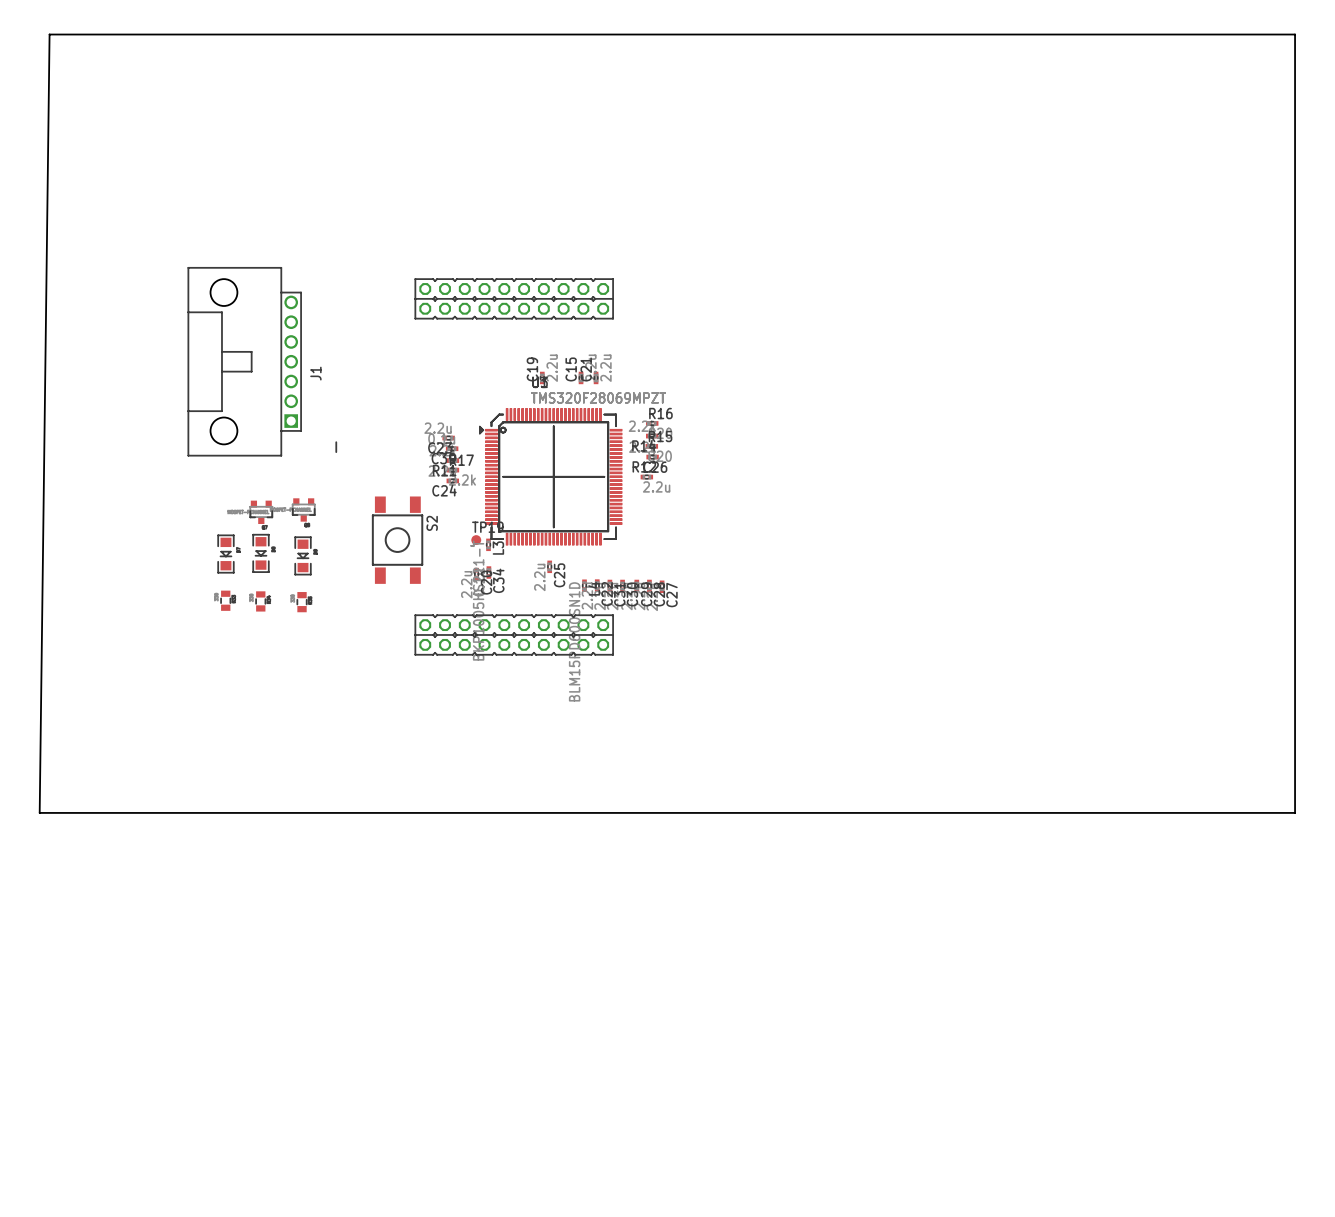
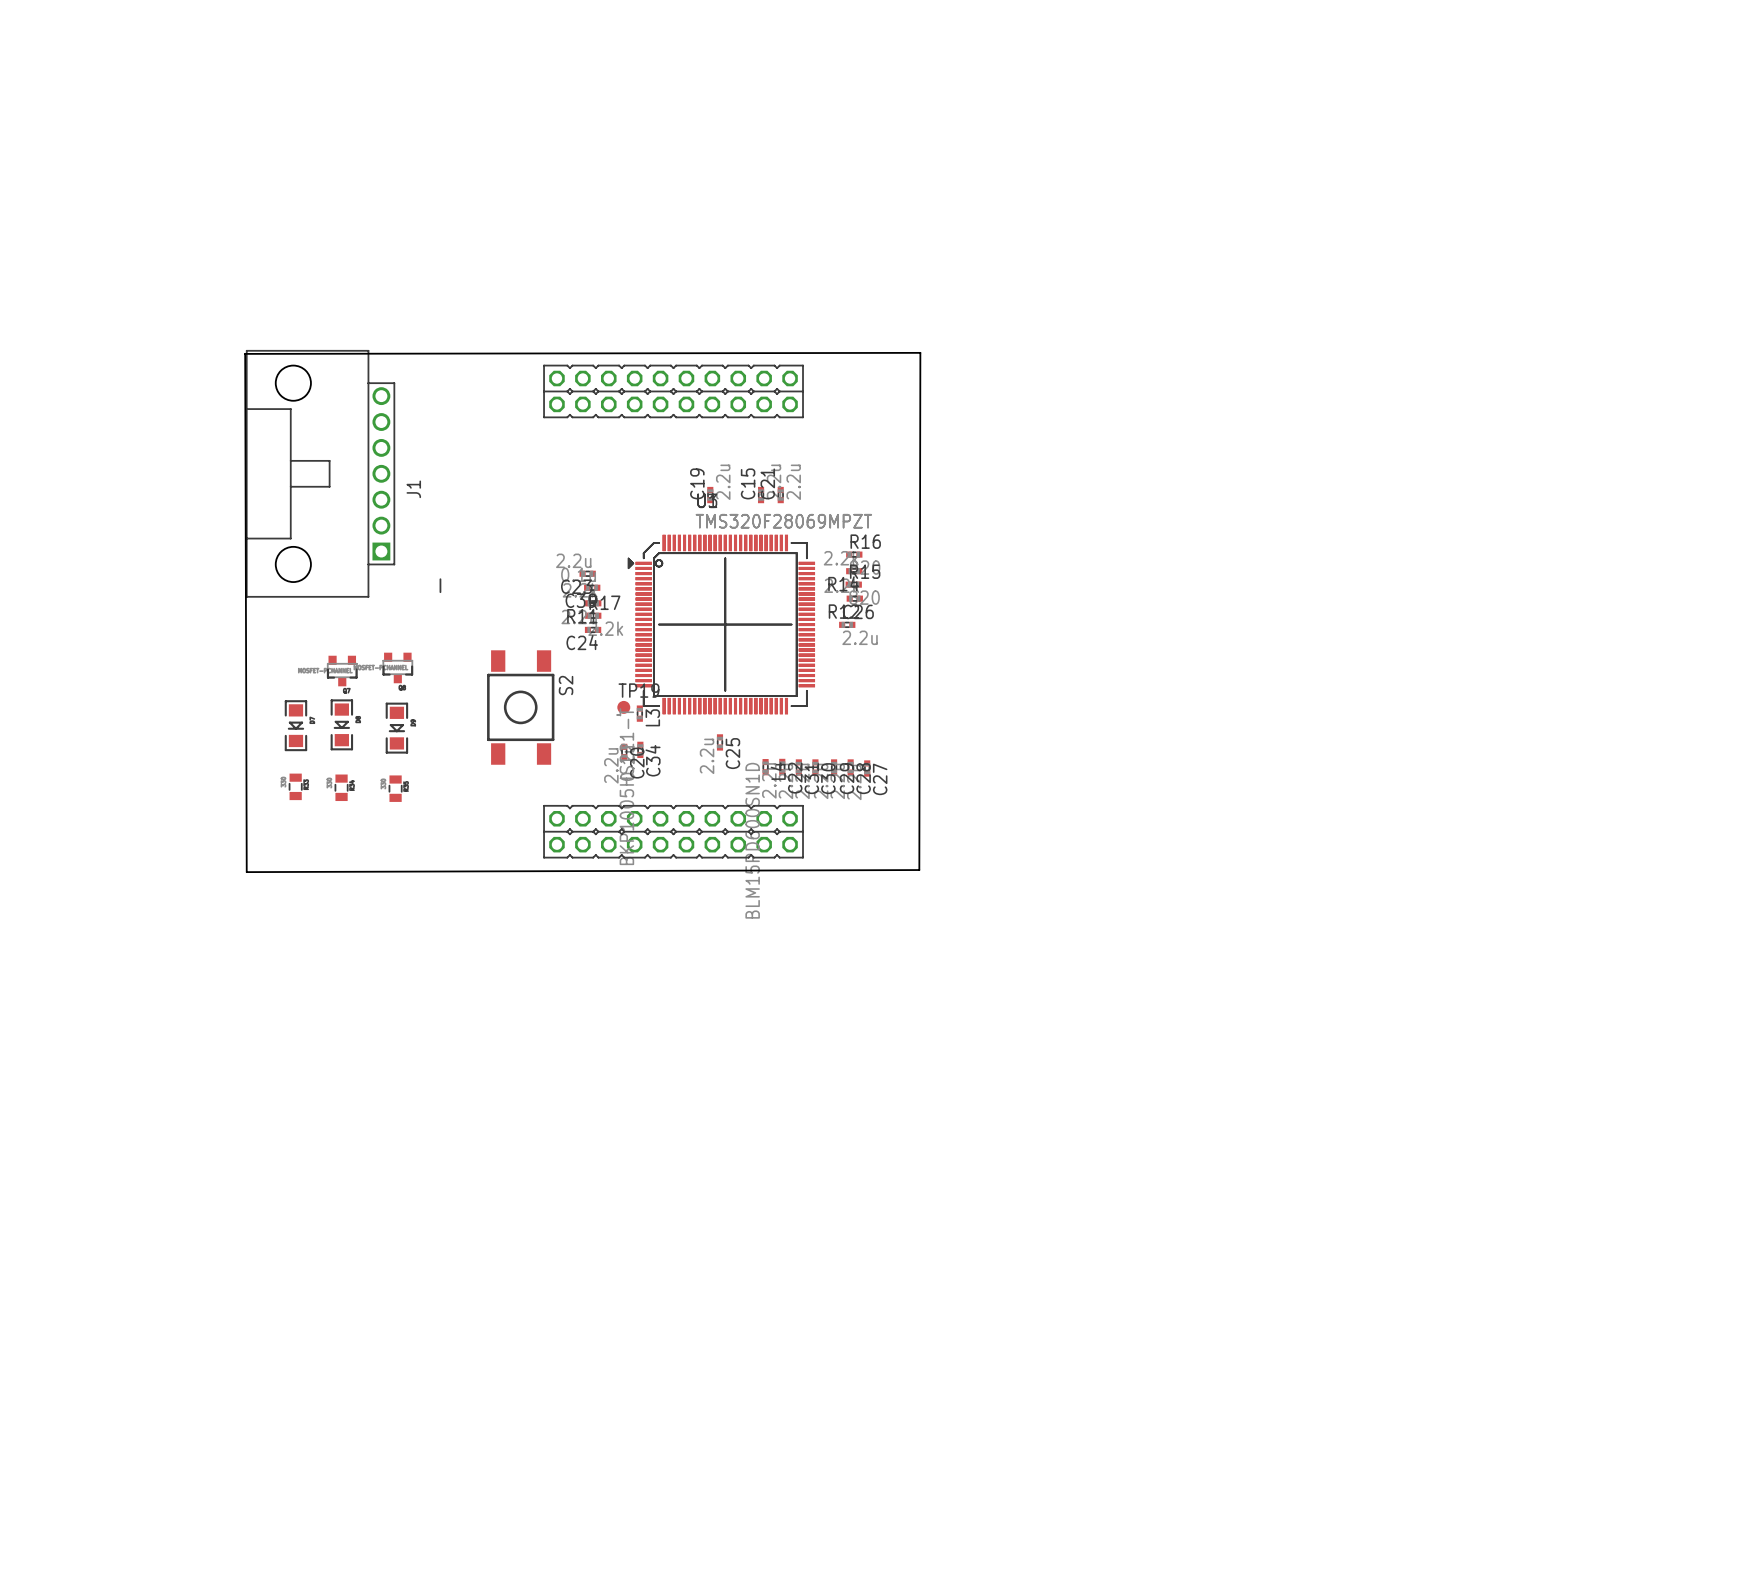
board edge: (49, 34) (1295, 34) (1295, 812) (39, 812) (49, 34) -> none
board edge: none -> (920, 352) (919, 870) (246, 872) (245, 353) (920, 352)

